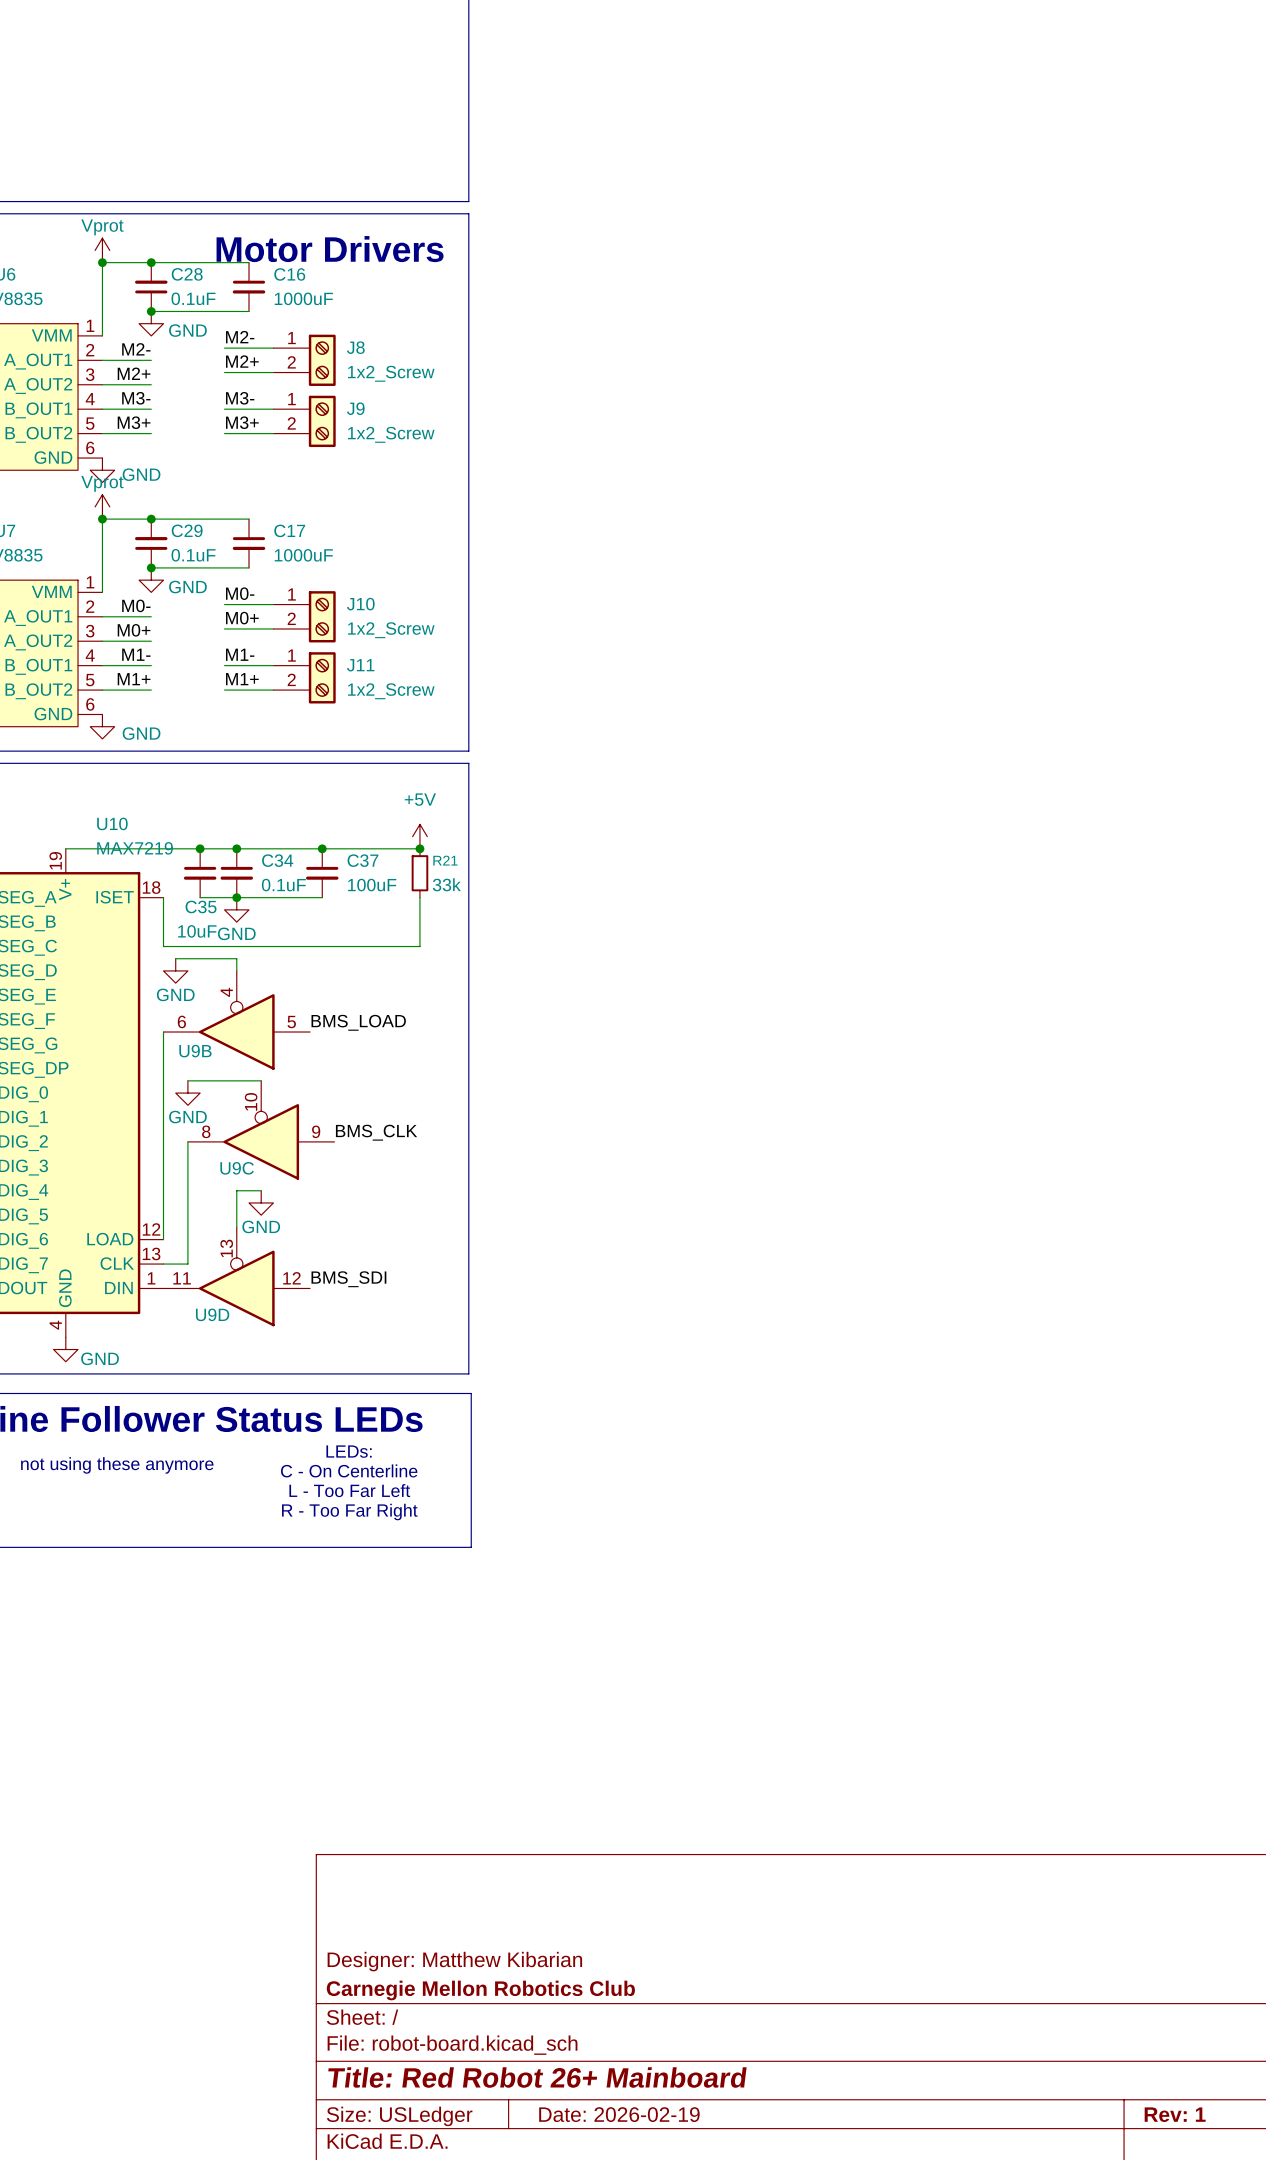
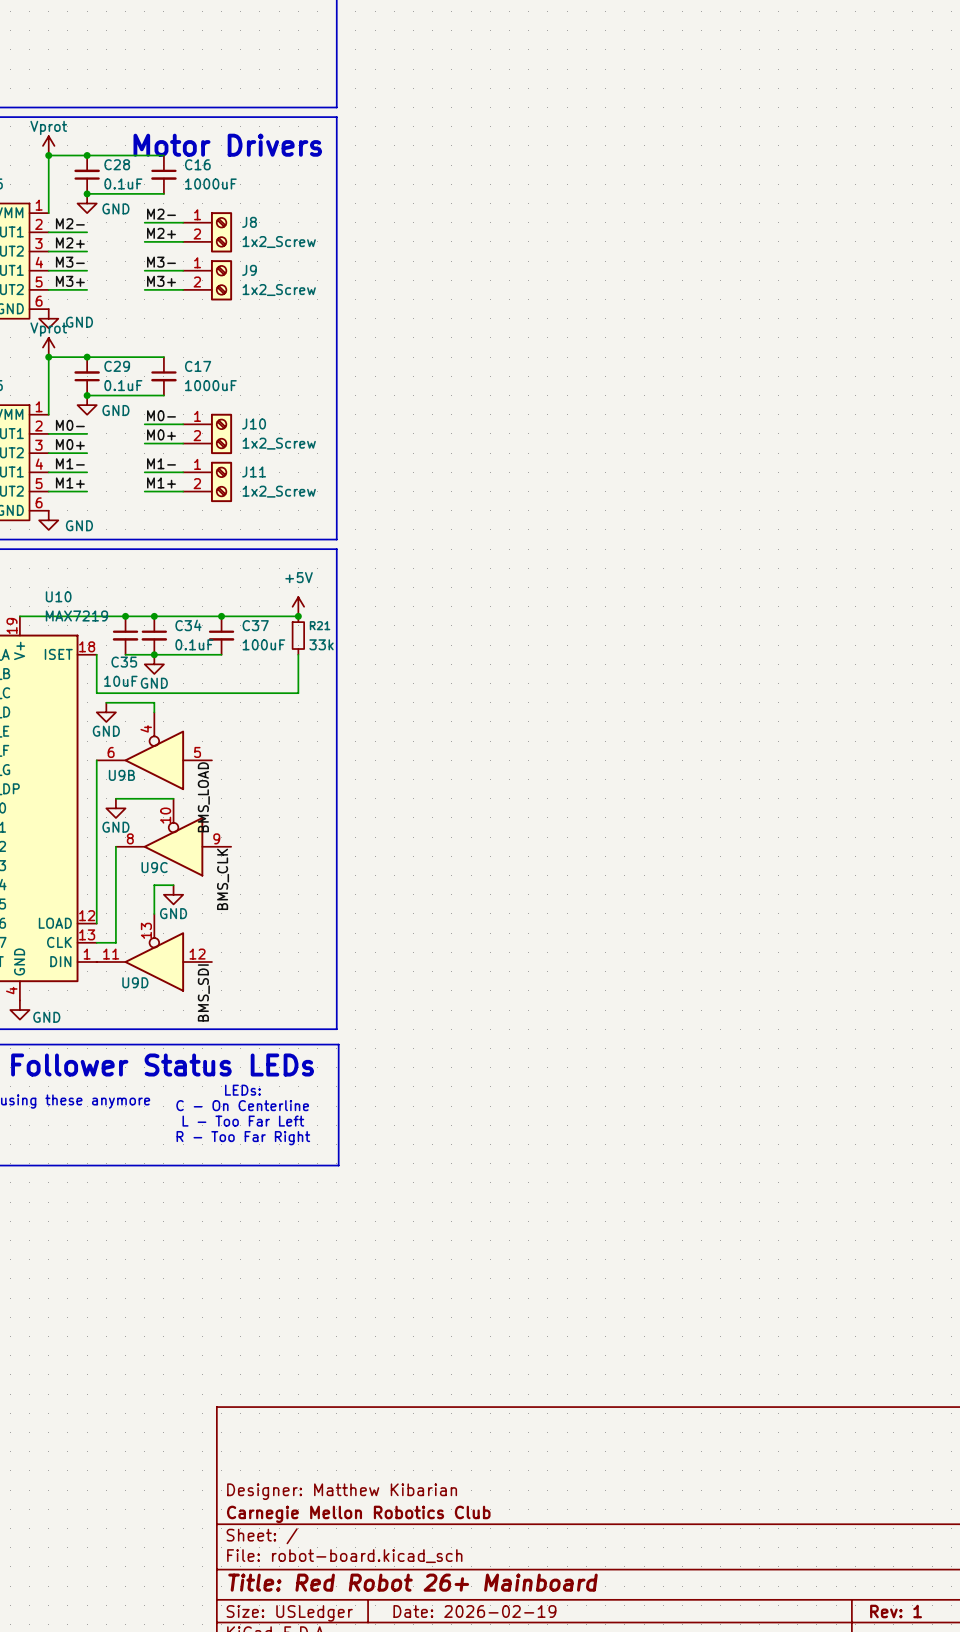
label rotation: 0° (358, 1022) -> 90° counterclockwise (203, 797)
label rotation: 0° (376, 1132) -> 90° counterclockwise (223, 879)
label rotation: 0° (348, 1279) -> 90° counterclockwise (203, 992)

